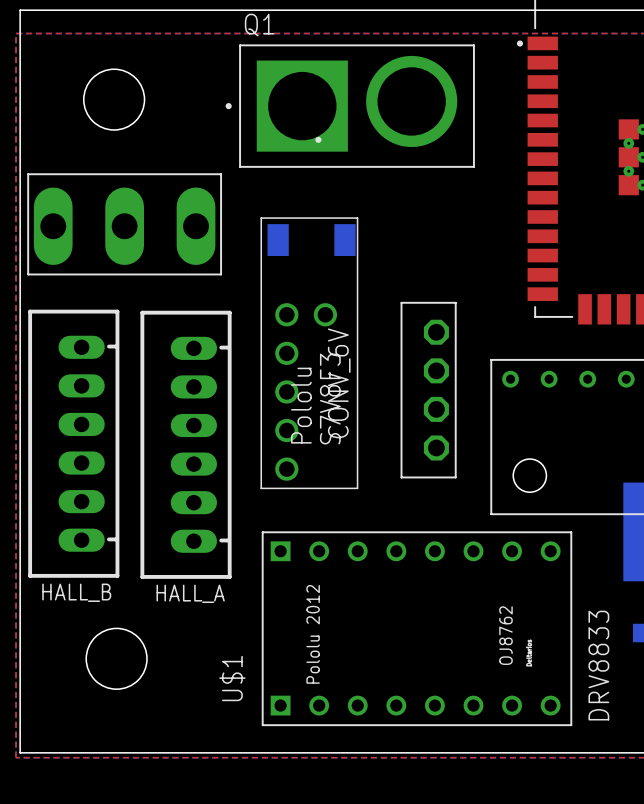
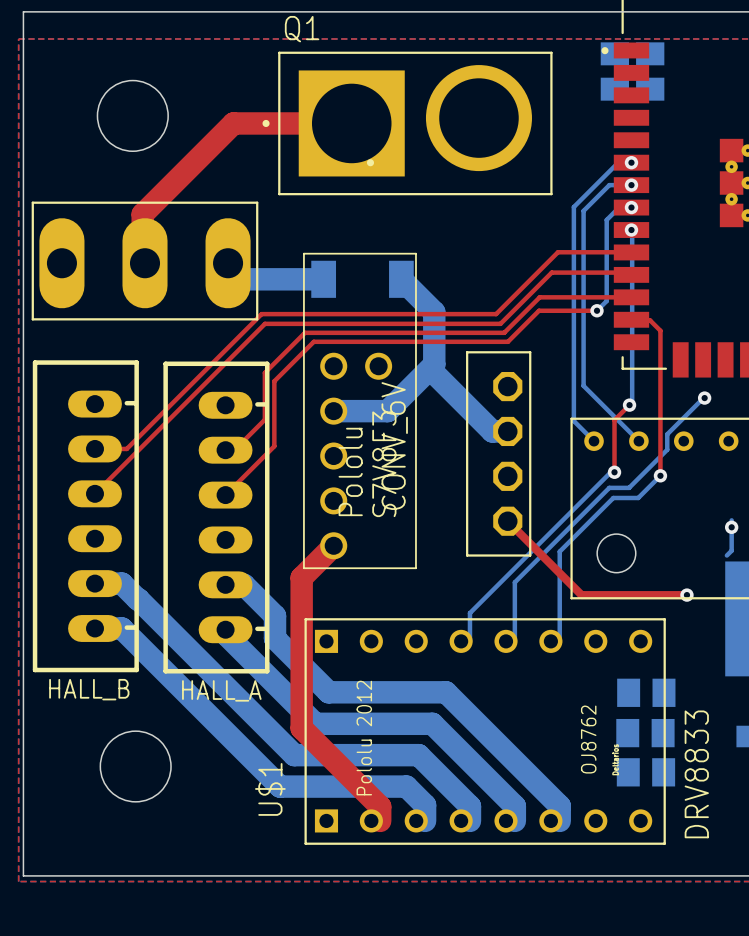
part: none -> (614, 71)
part: none -> (650, 71)
top track: none -> (351, 123) (233, 123) (142, 214) (142, 260) (145, 263)
bottom track: none -> (631, 162) (618, 162) (573, 207) (573, 421) (594, 441)
via: none -> (631, 162)
bottom track: none -> (631, 185) (609, 185) (583, 210) (583, 385) (638, 441)
via: none -> (631, 185)
bottom track: none -> (631, 207) (619, 207) (606, 219) (606, 301) (597, 310)
via: none -> (631, 207)
bottom track: none -> (631, 230) (632, 402) (629, 405)
via: none -> (631, 230)
top track: none -> (631, 252) (557, 252) (496, 314) (261, 314) (126, 448) (94, 448)
bottom track: none -> (228, 263) (244, 279) (323, 279)
top track: none -> (631, 274) (629, 272) (551, 272) (500, 323) (264, 323) (94, 493)
bottom track: none -> (401, 279) (434, 312) (434, 364) (387, 411) (333, 411)
top track: none -> (631, 297) (539, 297) (504, 332) (304, 332) (264, 372) (264, 419) (234, 450) (225, 450)
top track: none -> (597, 310) (539, 310) (507, 341) (313, 341) (274, 381) (274, 446) (225, 495)
via: none -> (597, 310)
top track: none -> (631, 319) (650, 320) (660, 330) (660, 475)
bottom track: none -> (434, 373) (492, 431) (507, 431)
bottom track: none -> (704, 398) (667, 434) (667, 449) (629, 487) (609, 487) (514, 582) (514, 641)
via: none -> (704, 398)
top track: none -> (629, 405) (614, 420) (614, 472)
via: none -> (629, 405)
bottom track: none -> (614, 472) (610, 472) (469, 613) (469, 641)
via: none -> (614, 472)
bottom track: none -> (660, 475) (638, 497) (613, 497) (559, 551) (559, 641)
via: none -> (660, 475)
top track: none -> (507, 521) (581, 595) (686, 595)
bottom track: none -> (731, 520) (731, 550) (726, 555)
via: none -> (731, 527)
top track: none -> (333, 545) (301, 577) (301, 728) (380, 806) (380, 820)
bottom track: none -> (94, 583) (121, 583) (294, 755) (418, 755) (469, 806) (469, 820)
bottom track: none -> (225, 584) (243, 584) (275, 615) (275, 638) (328, 692) (446, 692) (559, 806) (559, 820)
via: none -> (686, 595)
bottom track: none -> (94, 628) (121, 628) (280, 786) (406, 786) (425, 805) (425, 820)
bottom track: none -> (225, 629) (225, 634) (315, 723) (432, 723) (514, 806) (514, 820)
part: none -> (646, 692)
part: none -> (645, 733)
part: none -> (645, 772)

